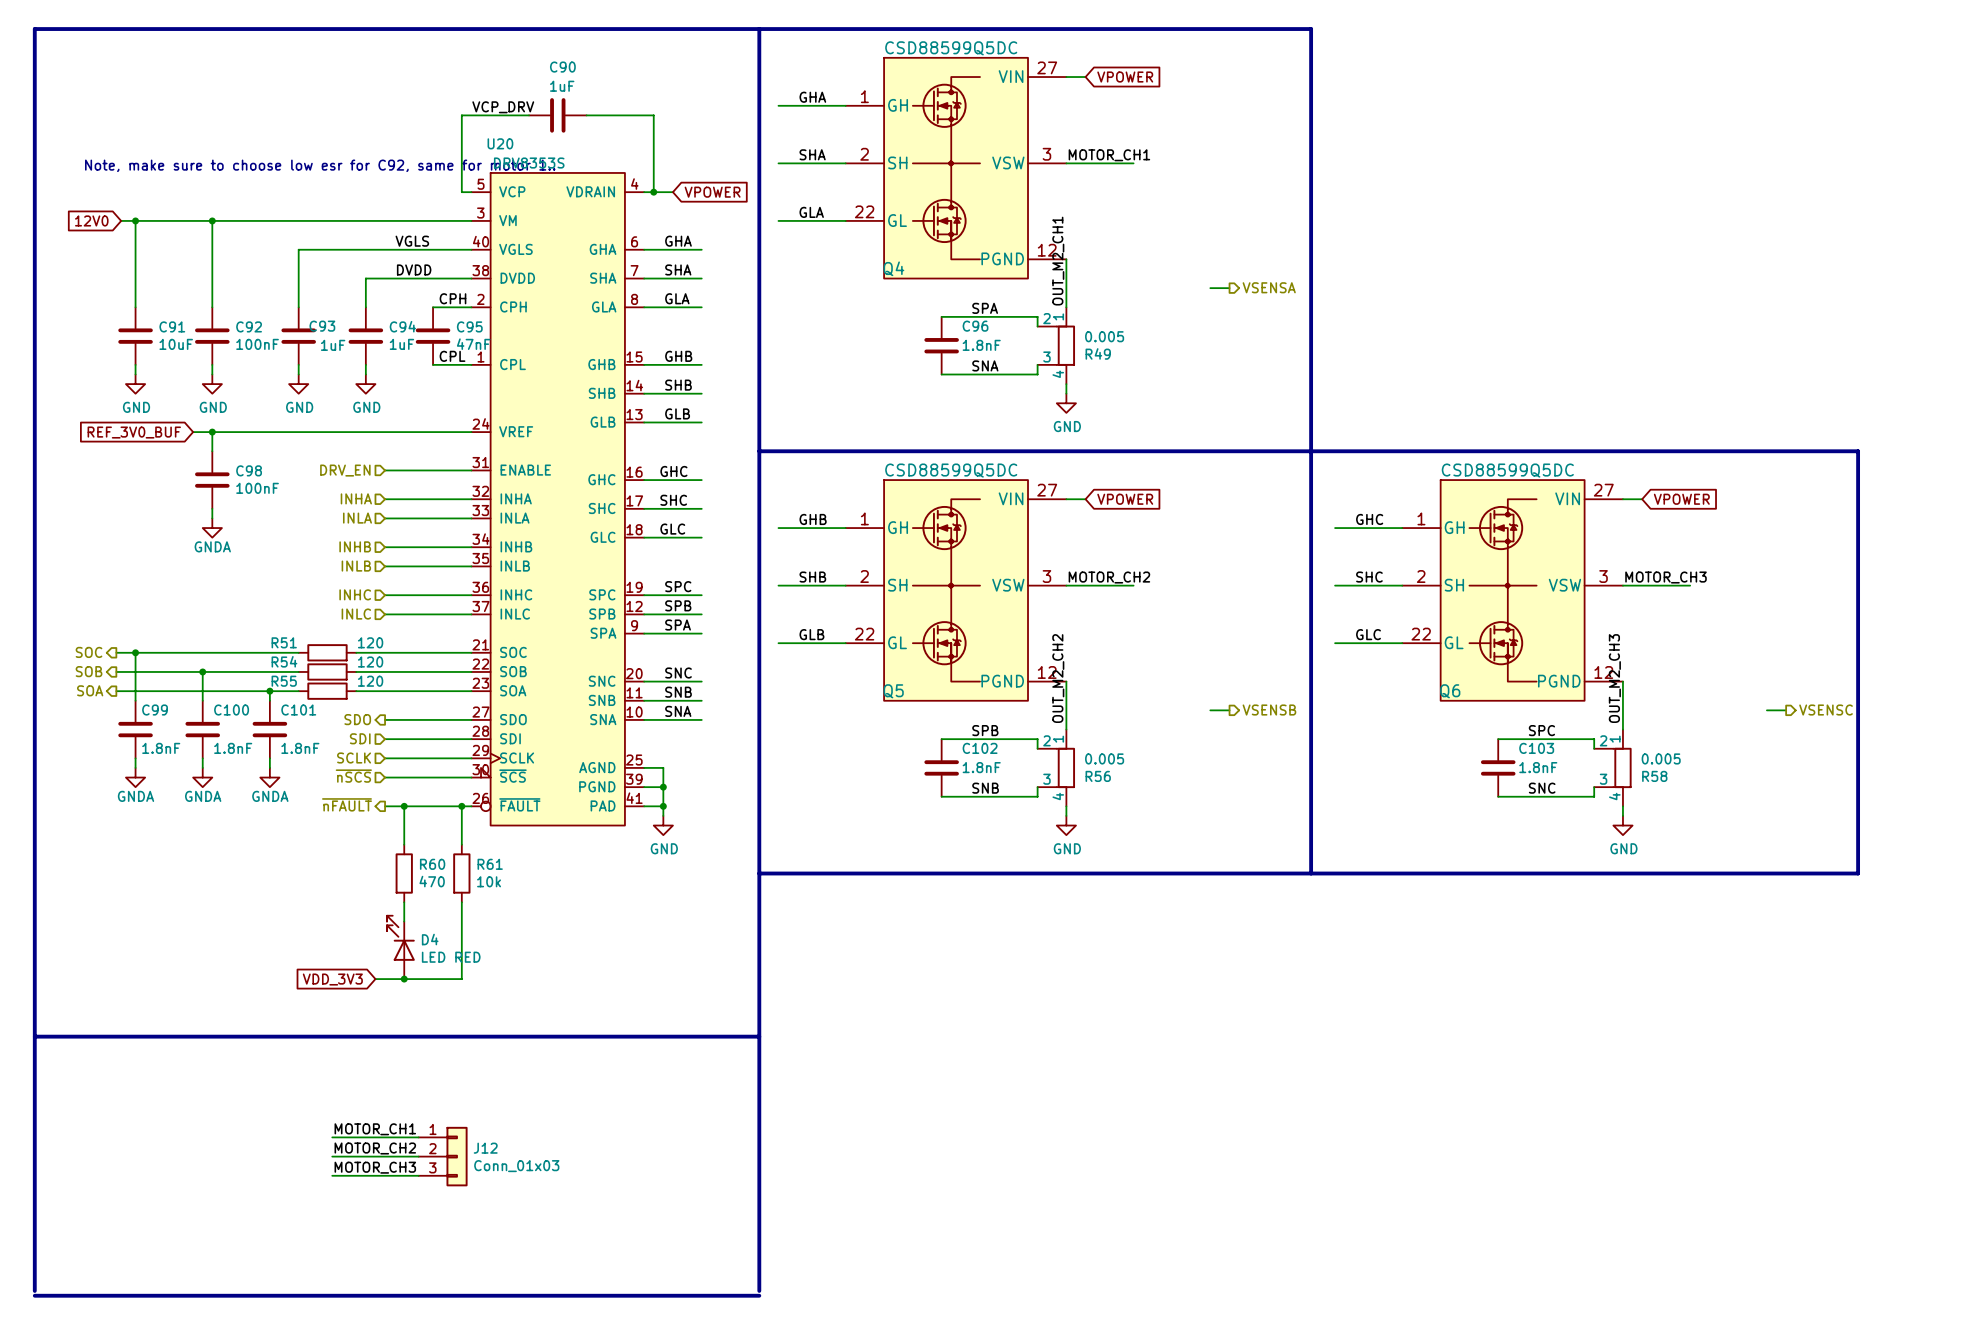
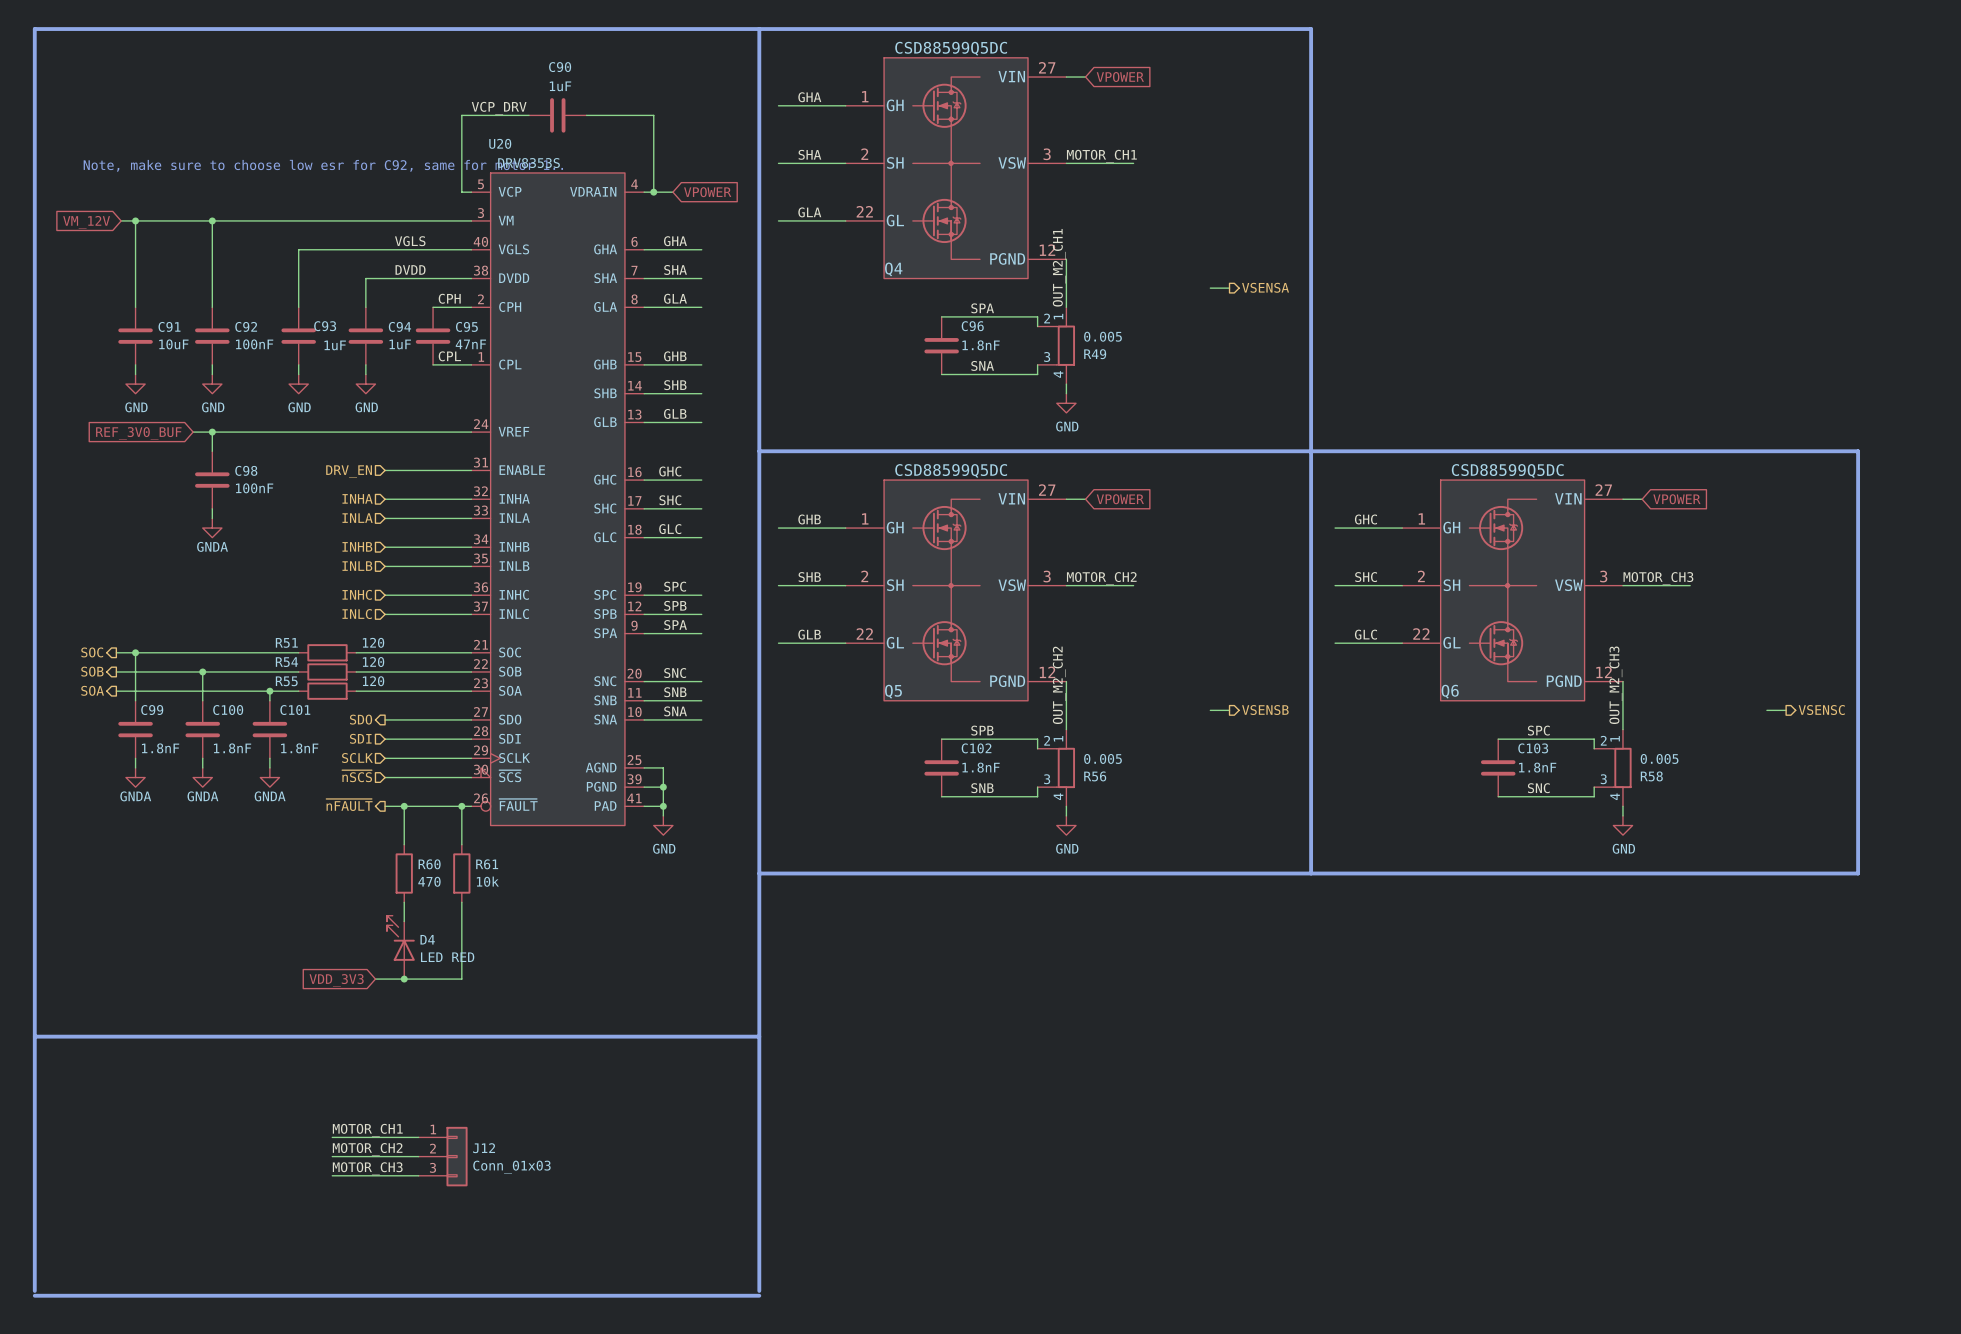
global label: 12V0 (91, 220) -> VM_12V (86, 222)

